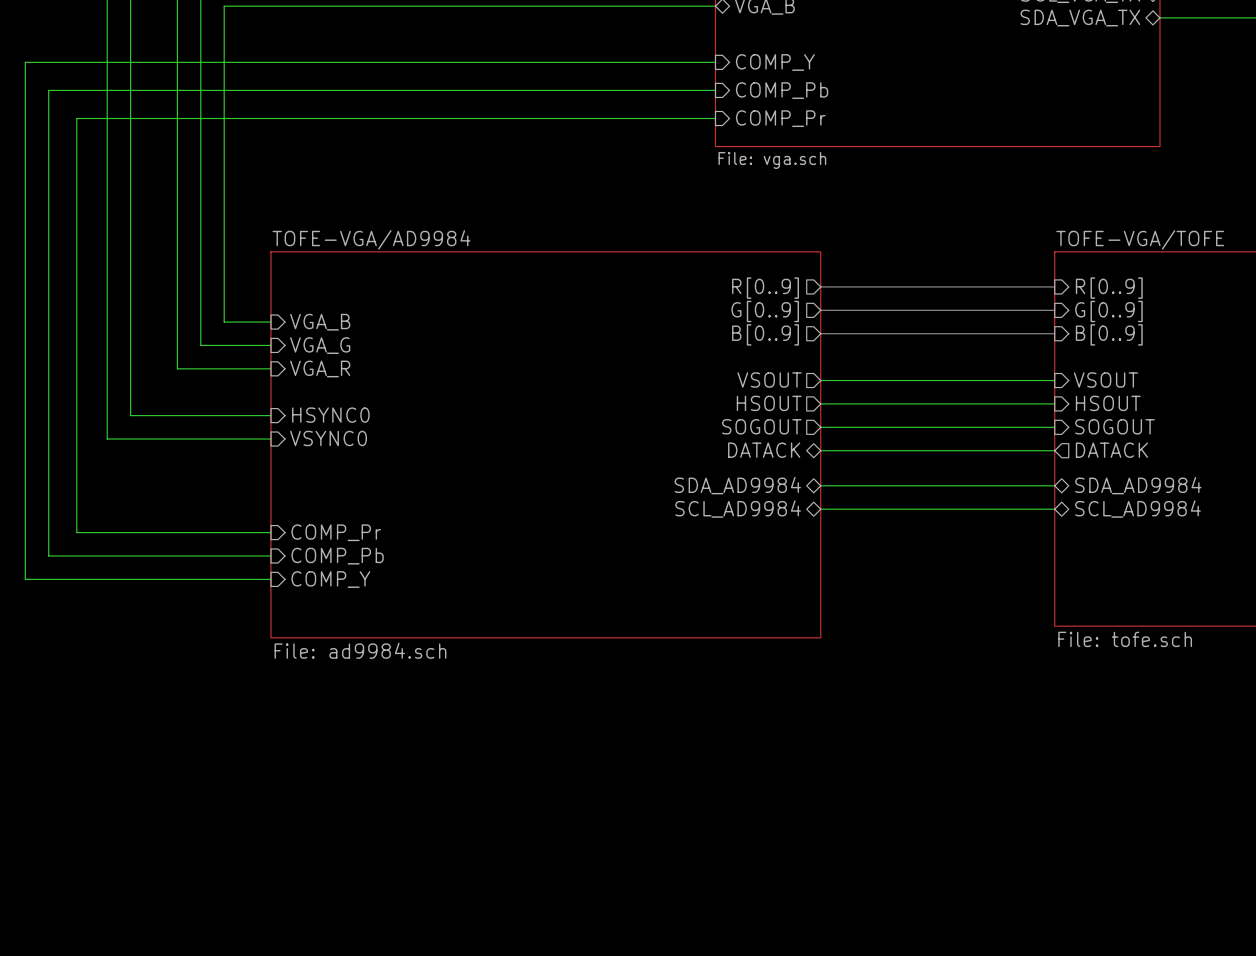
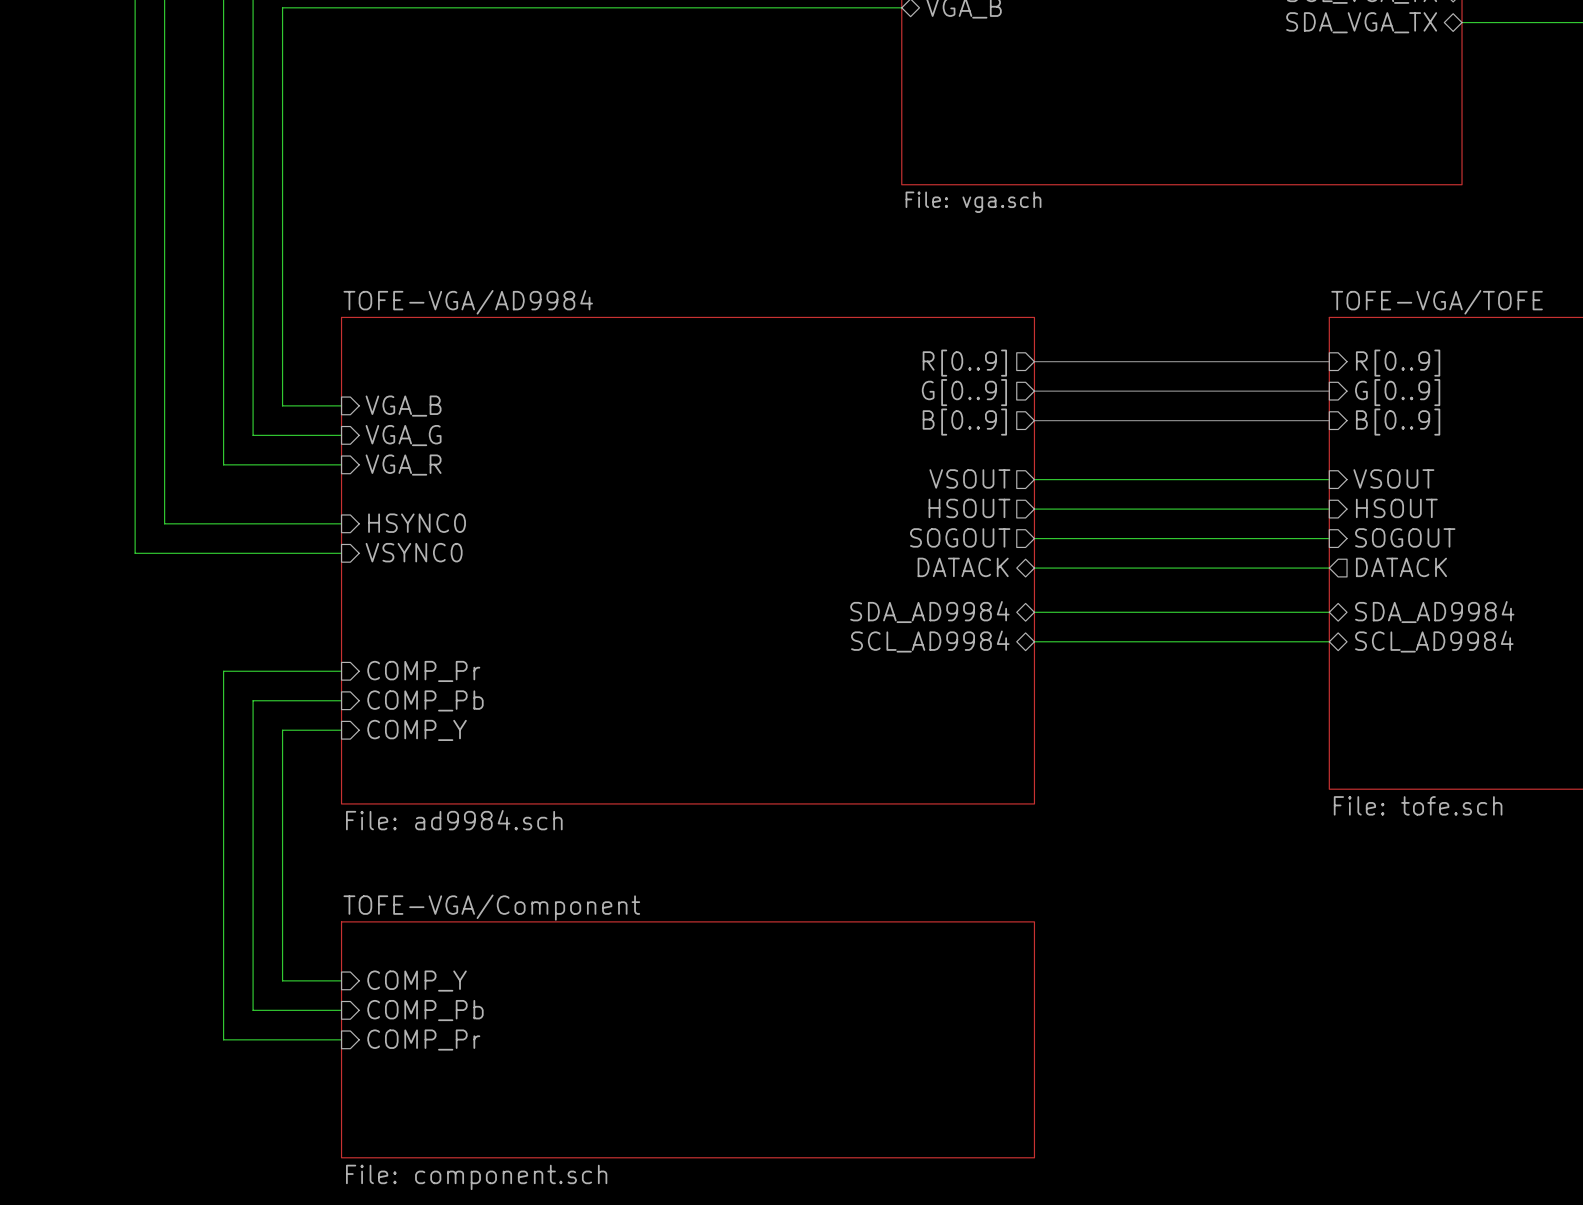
wire: (715, 62) (25, 62) (25, 579) (224, 579) -> (341, 980) (282, 980) (282, 730)
sheet pin: COMP_Y (775, 62) -> none
wire: (715, 90) (48, 90) (48, 555) (200, 555) -> (341, 1010) (253, 1010) (253, 700)
sheet pin: COMP_Pb (782, 90) -> none
wire: (715, 118) (76, 118) (76, 532) (177, 532) -> (341, 1039) (223, 1039) (223, 671)
sheet pin: COMP_Pr (780, 118) -> none
sheet pin: none -> COMP_Y (417, 981)
sheet pin: none -> COMP_Pb (425, 1010)
sheet pin: none -> COMP_Pr (423, 1040)
sheet TOFE-VGA/Component: none -> File: component.sch (687, 1039)

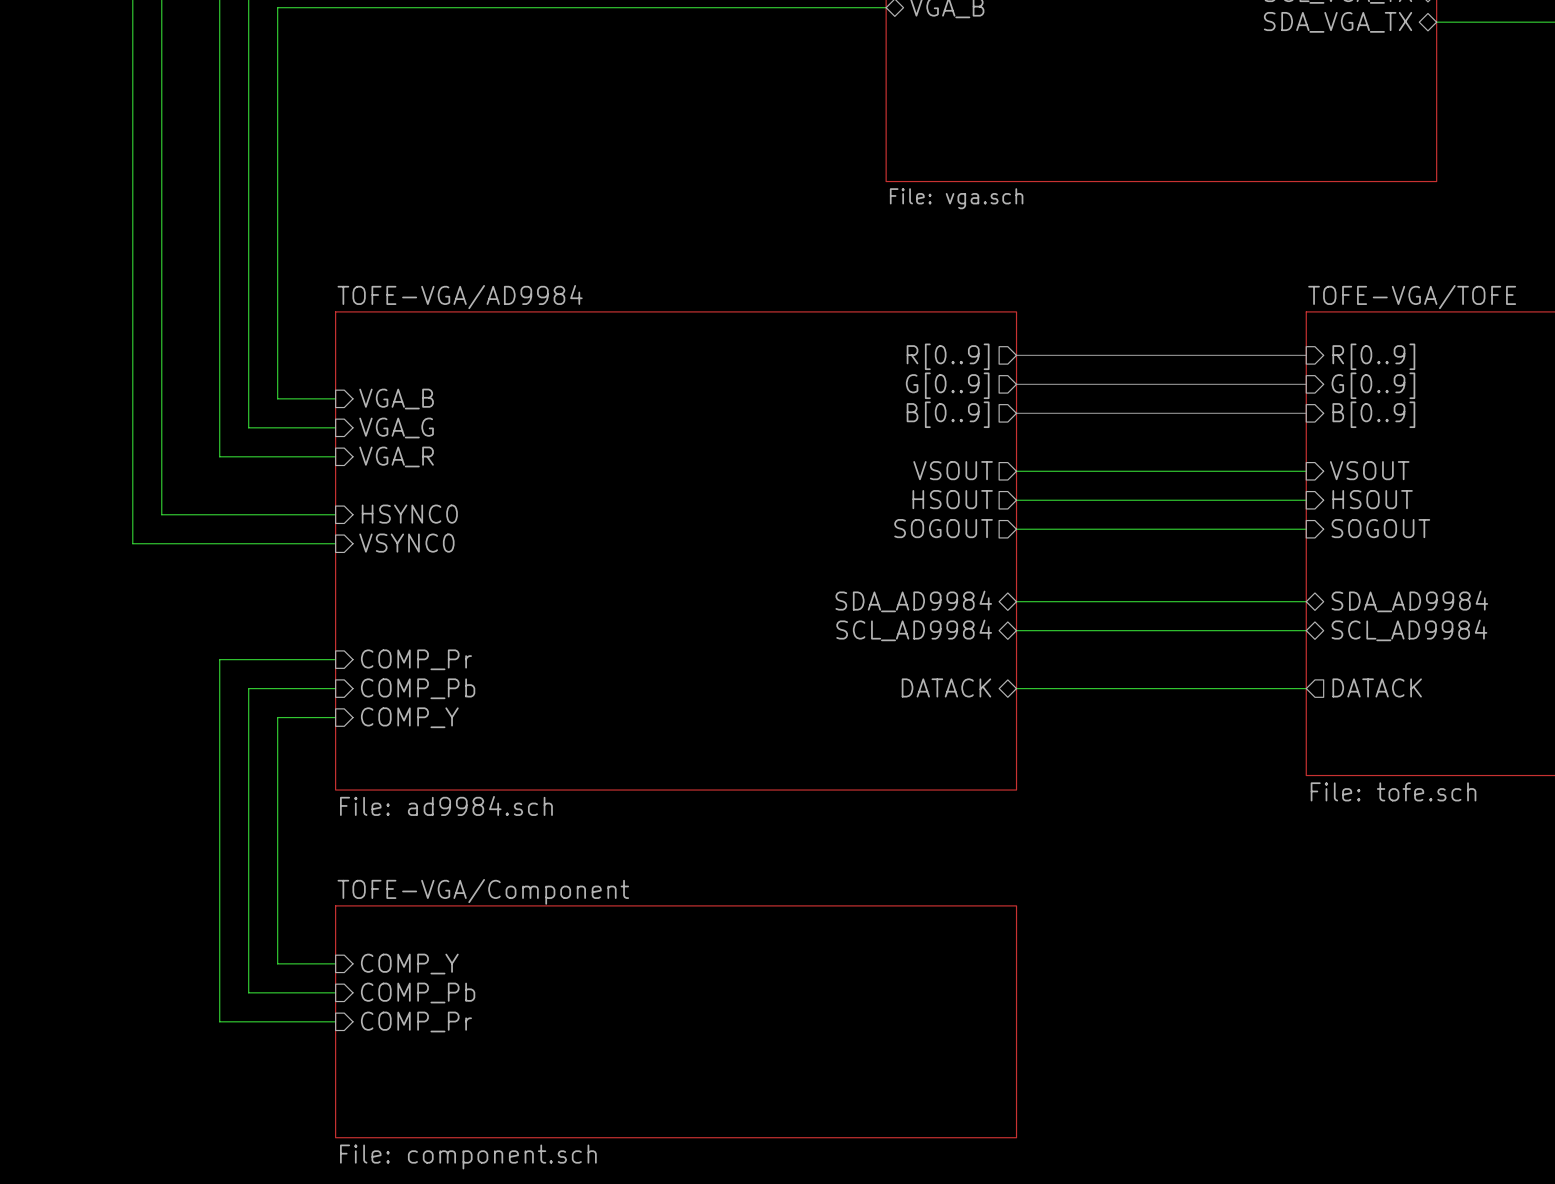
sheet pin position: DATACK (963, 567) -> DATACK (946, 687)
sheet pin position: DATACK (1401, 567) -> DATACK (1377, 687)
wire: (1034, 568) (1329, 568) -> (1016, 688) (1306, 688)

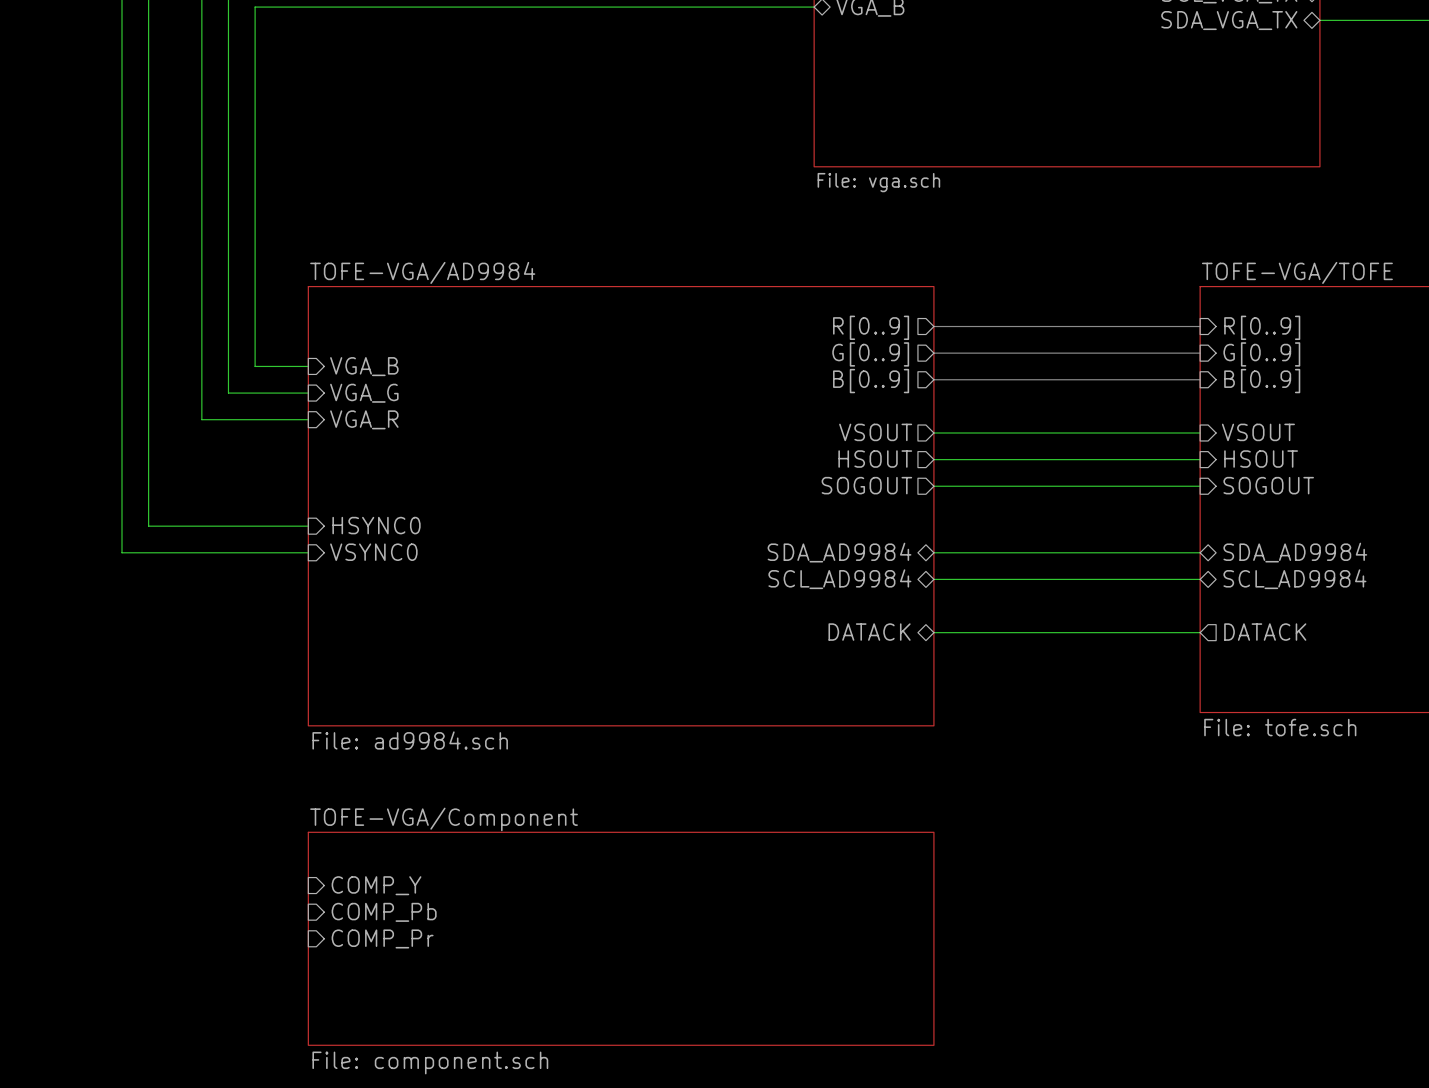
wire: (161, 514) (335, 514) -> (148, 472) (148, 526) (308, 526)
sheet pin position: HSYNC0 (409, 514) -> HSYNC0 (376, 525)
wire: (132, 543) (335, 543) -> (121, 499) (121, 552) (308, 552)
sheet pin position: VSYNC0 (406, 543) -> VSYNC0 (373, 552)
wire: (335, 659) (219, 659) (219, 1021) (335, 1021) -> none
sheet pin: COMP_Pr (416, 659) -> none
wire: (335, 688) (248, 688) (248, 992) (335, 992) -> none
sheet pin: COMP_Pb (418, 688) -> none
wire: (335, 717) (277, 717) (277, 963) (335, 963) -> none
sheet pin: COMP_Y (409, 717) -> none

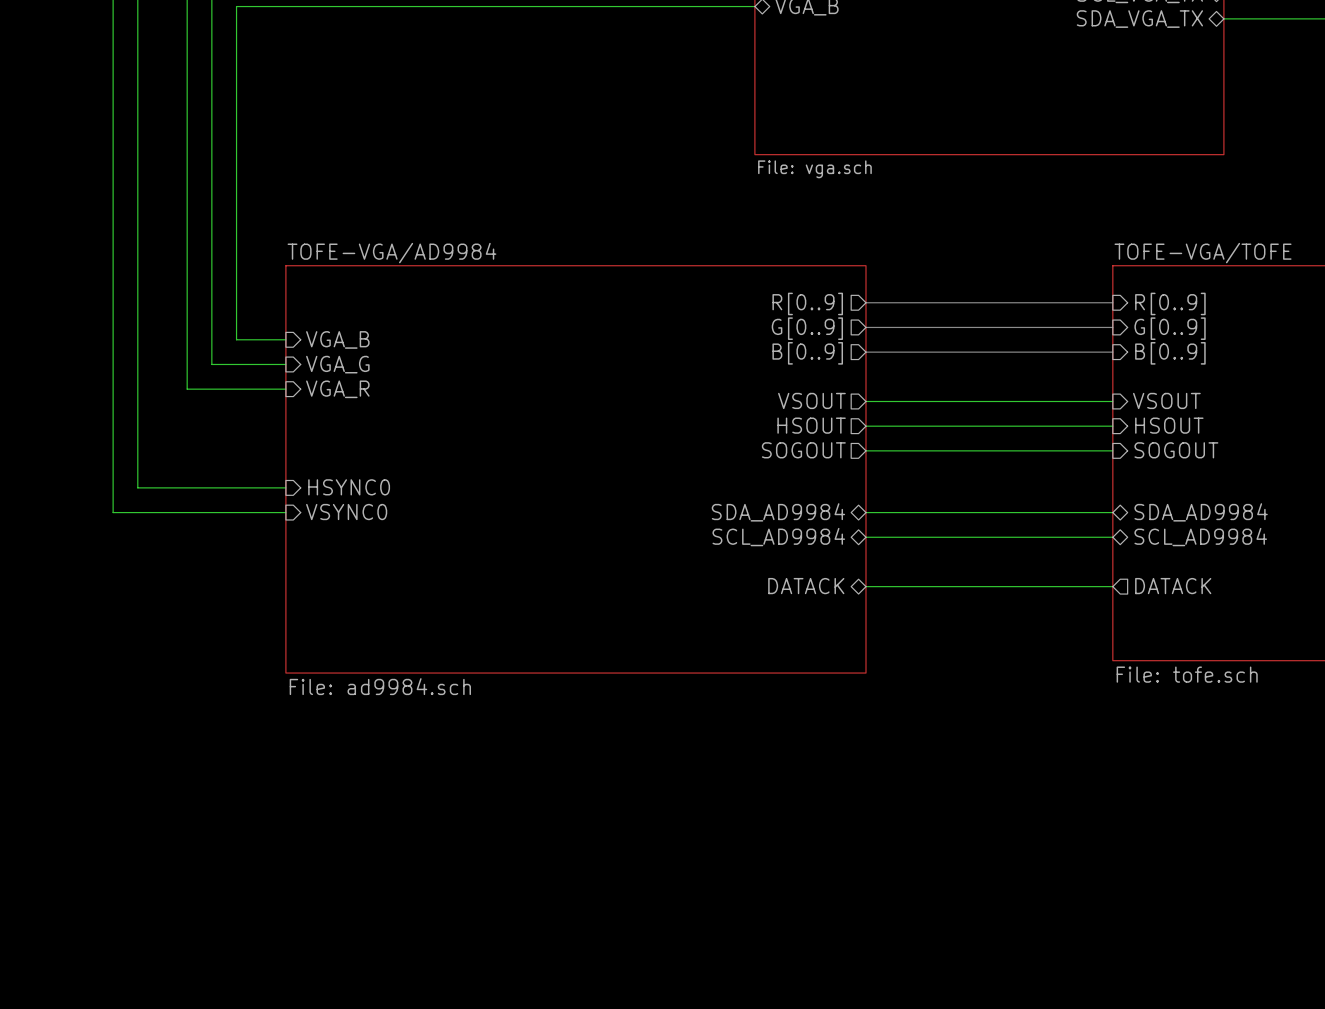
sheet pin: COMP_Y (376, 885) -> none
sheet pin: COMP_Pb (384, 912) -> none
sheet pin: COMP_Pr (382, 938) -> none
sheet TOFE-VGA/Component: File: component.sch (621, 938) -> none

